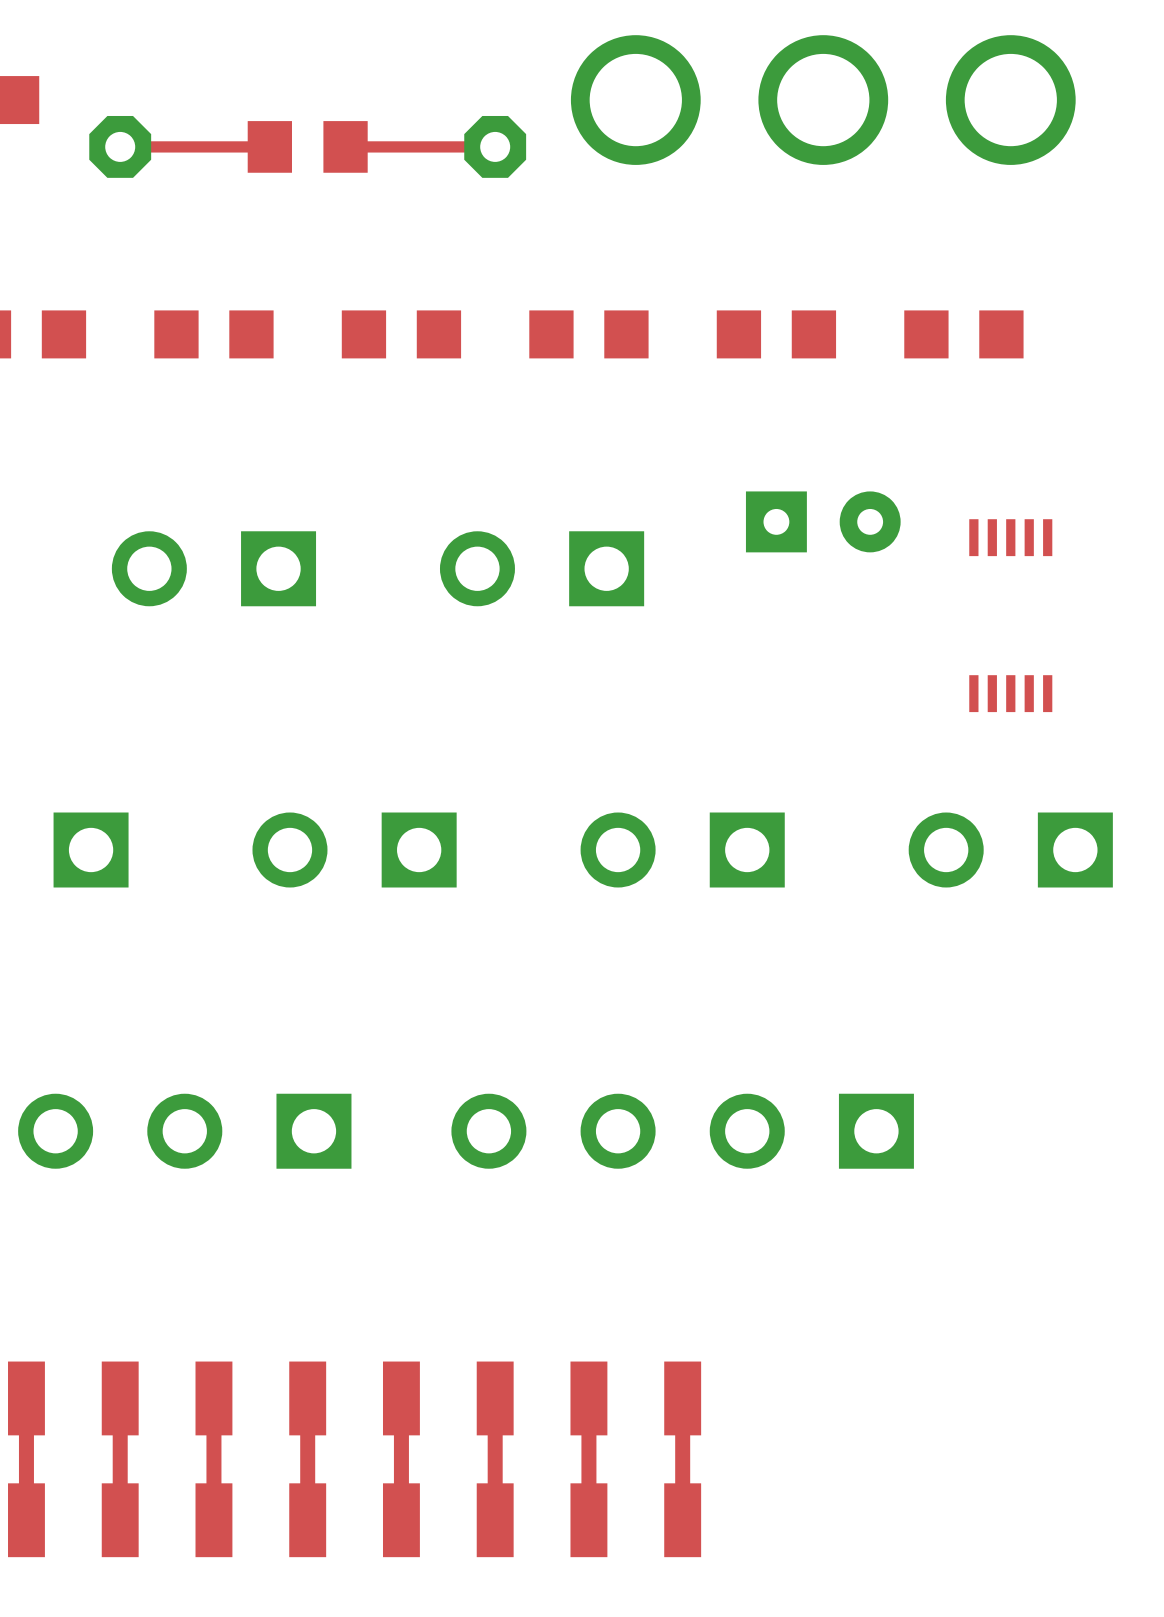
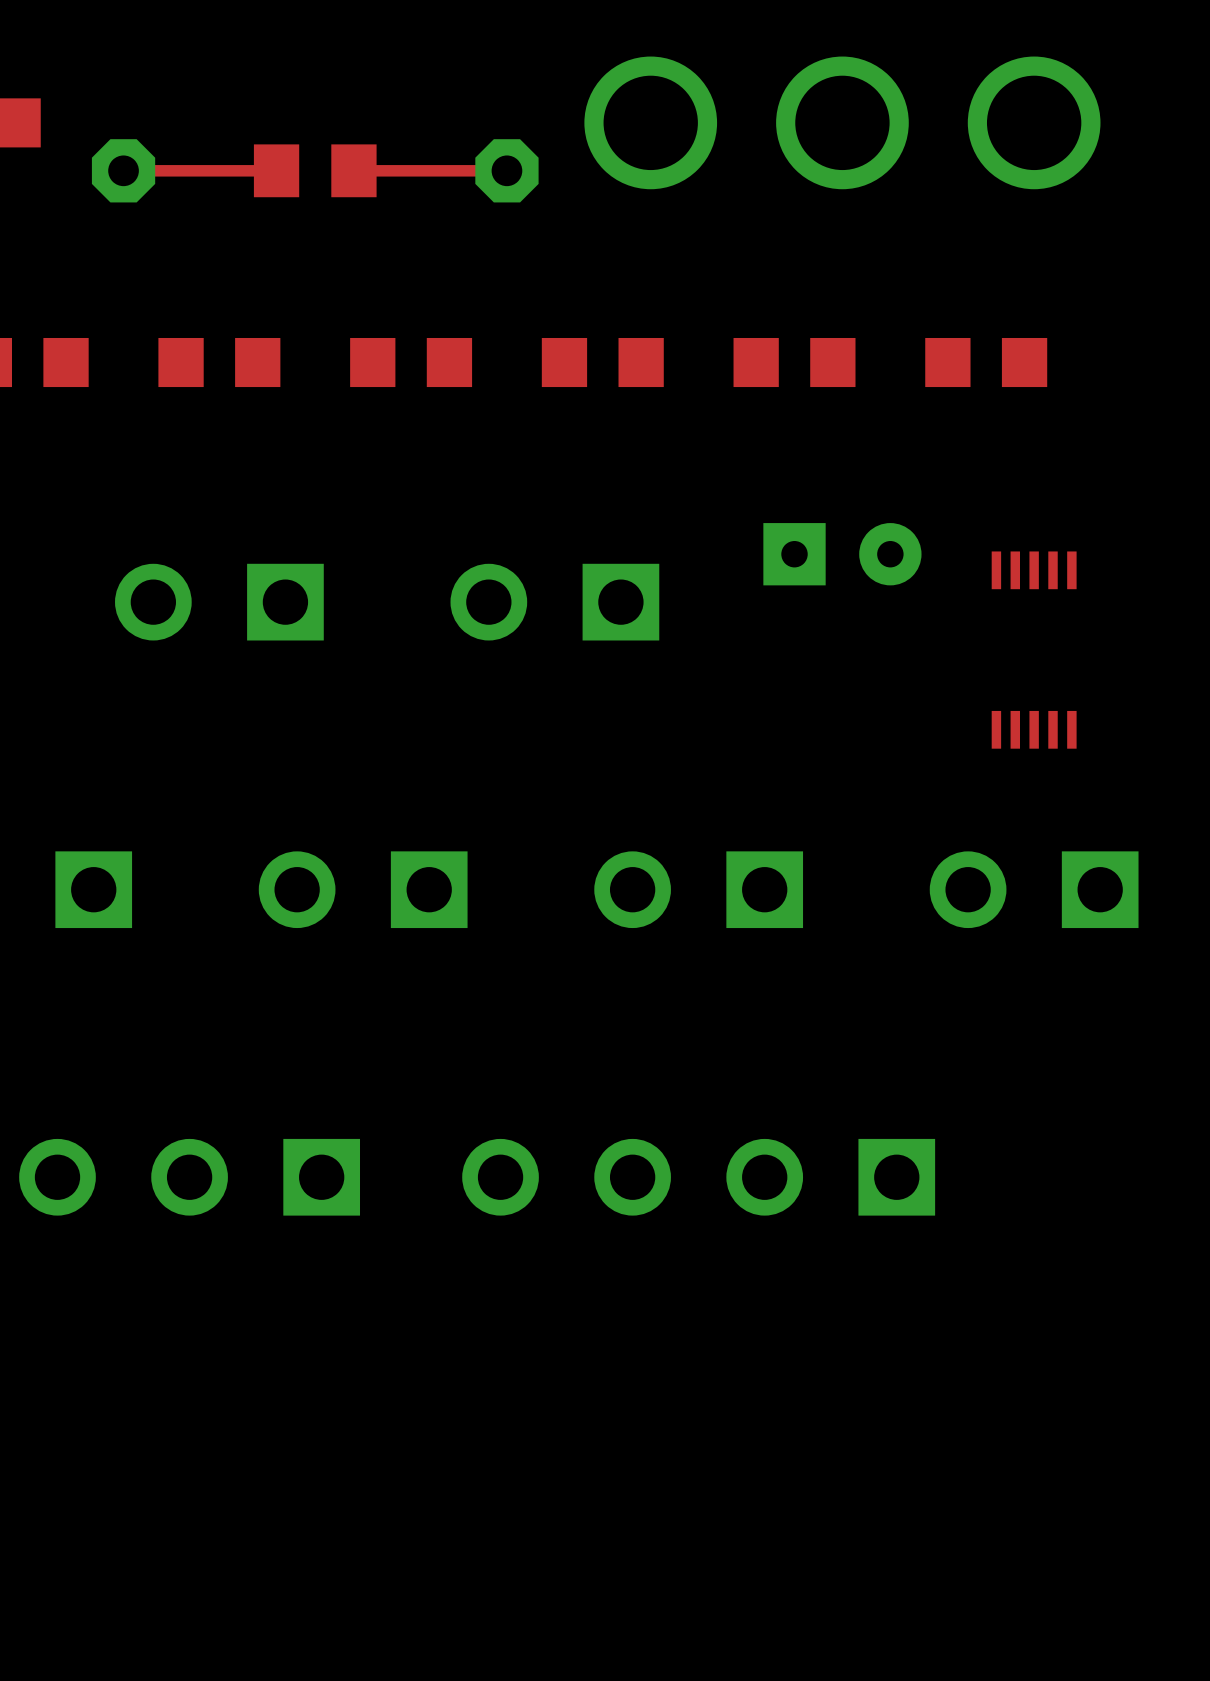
part: (354, 1459) -> none

